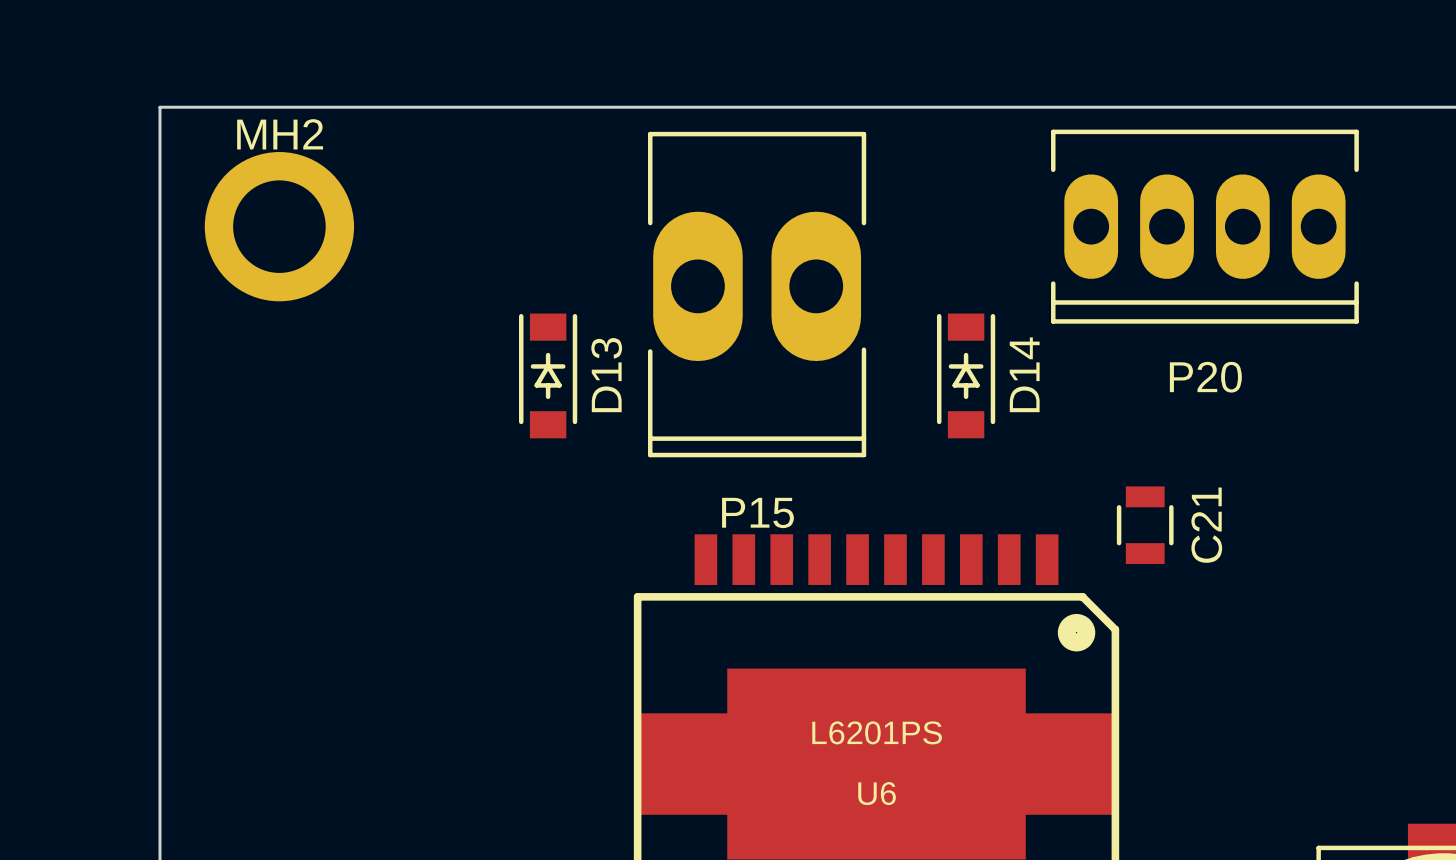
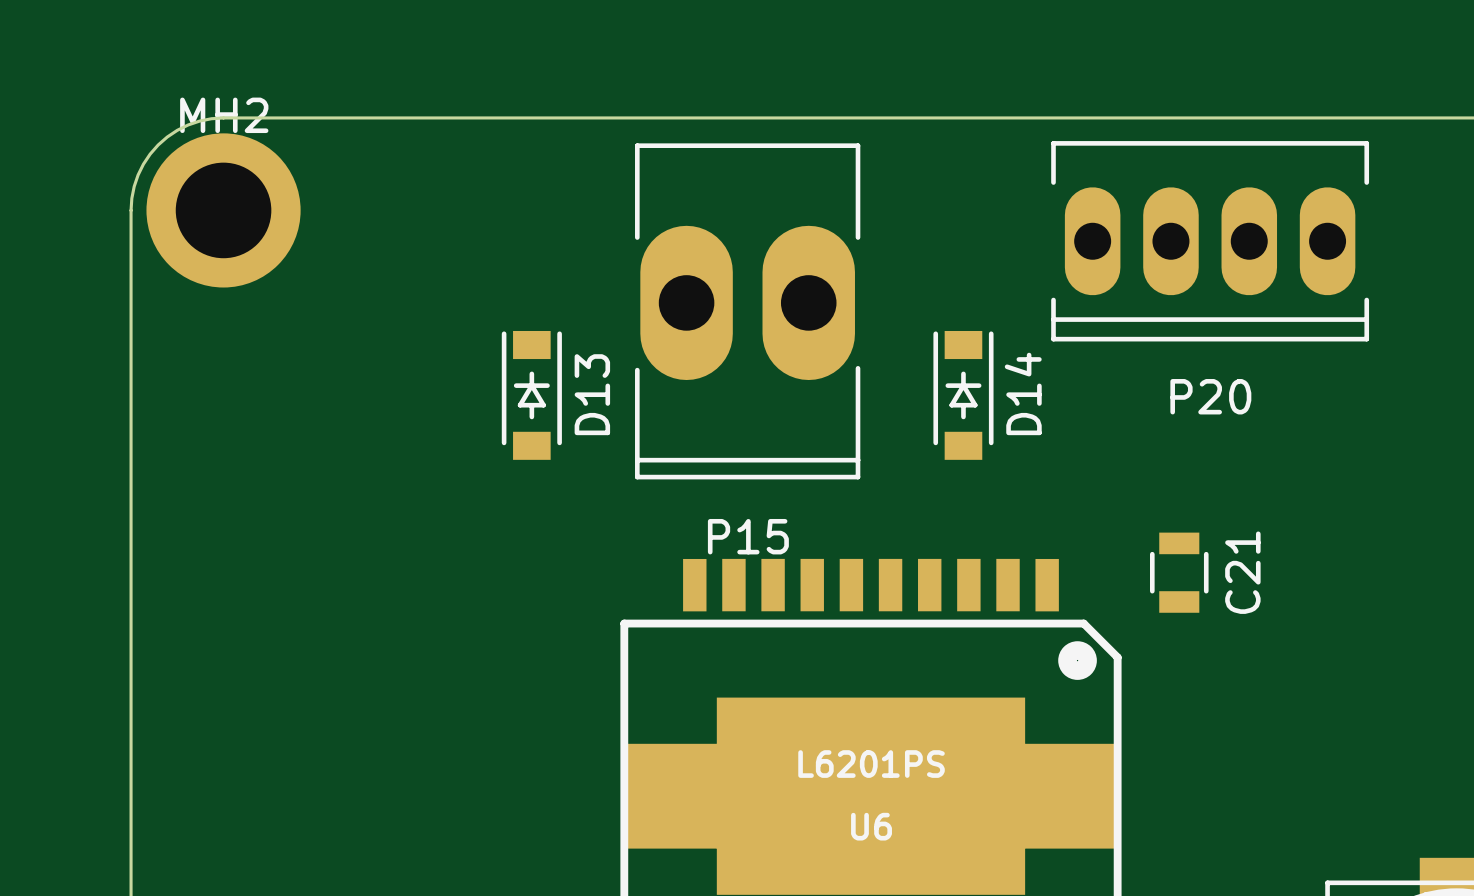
board edge: (249, 107) (159, 107) (159, 196) -> (223, 117) (199, 121) (188, 124) (177, 130) (158, 145) (143, 164) (138, 175) (131, 198) (131, 210)
MH2 position: (279, 226) -> (223, 210)
C21 position: (1145, 525) -> (1179, 572)

